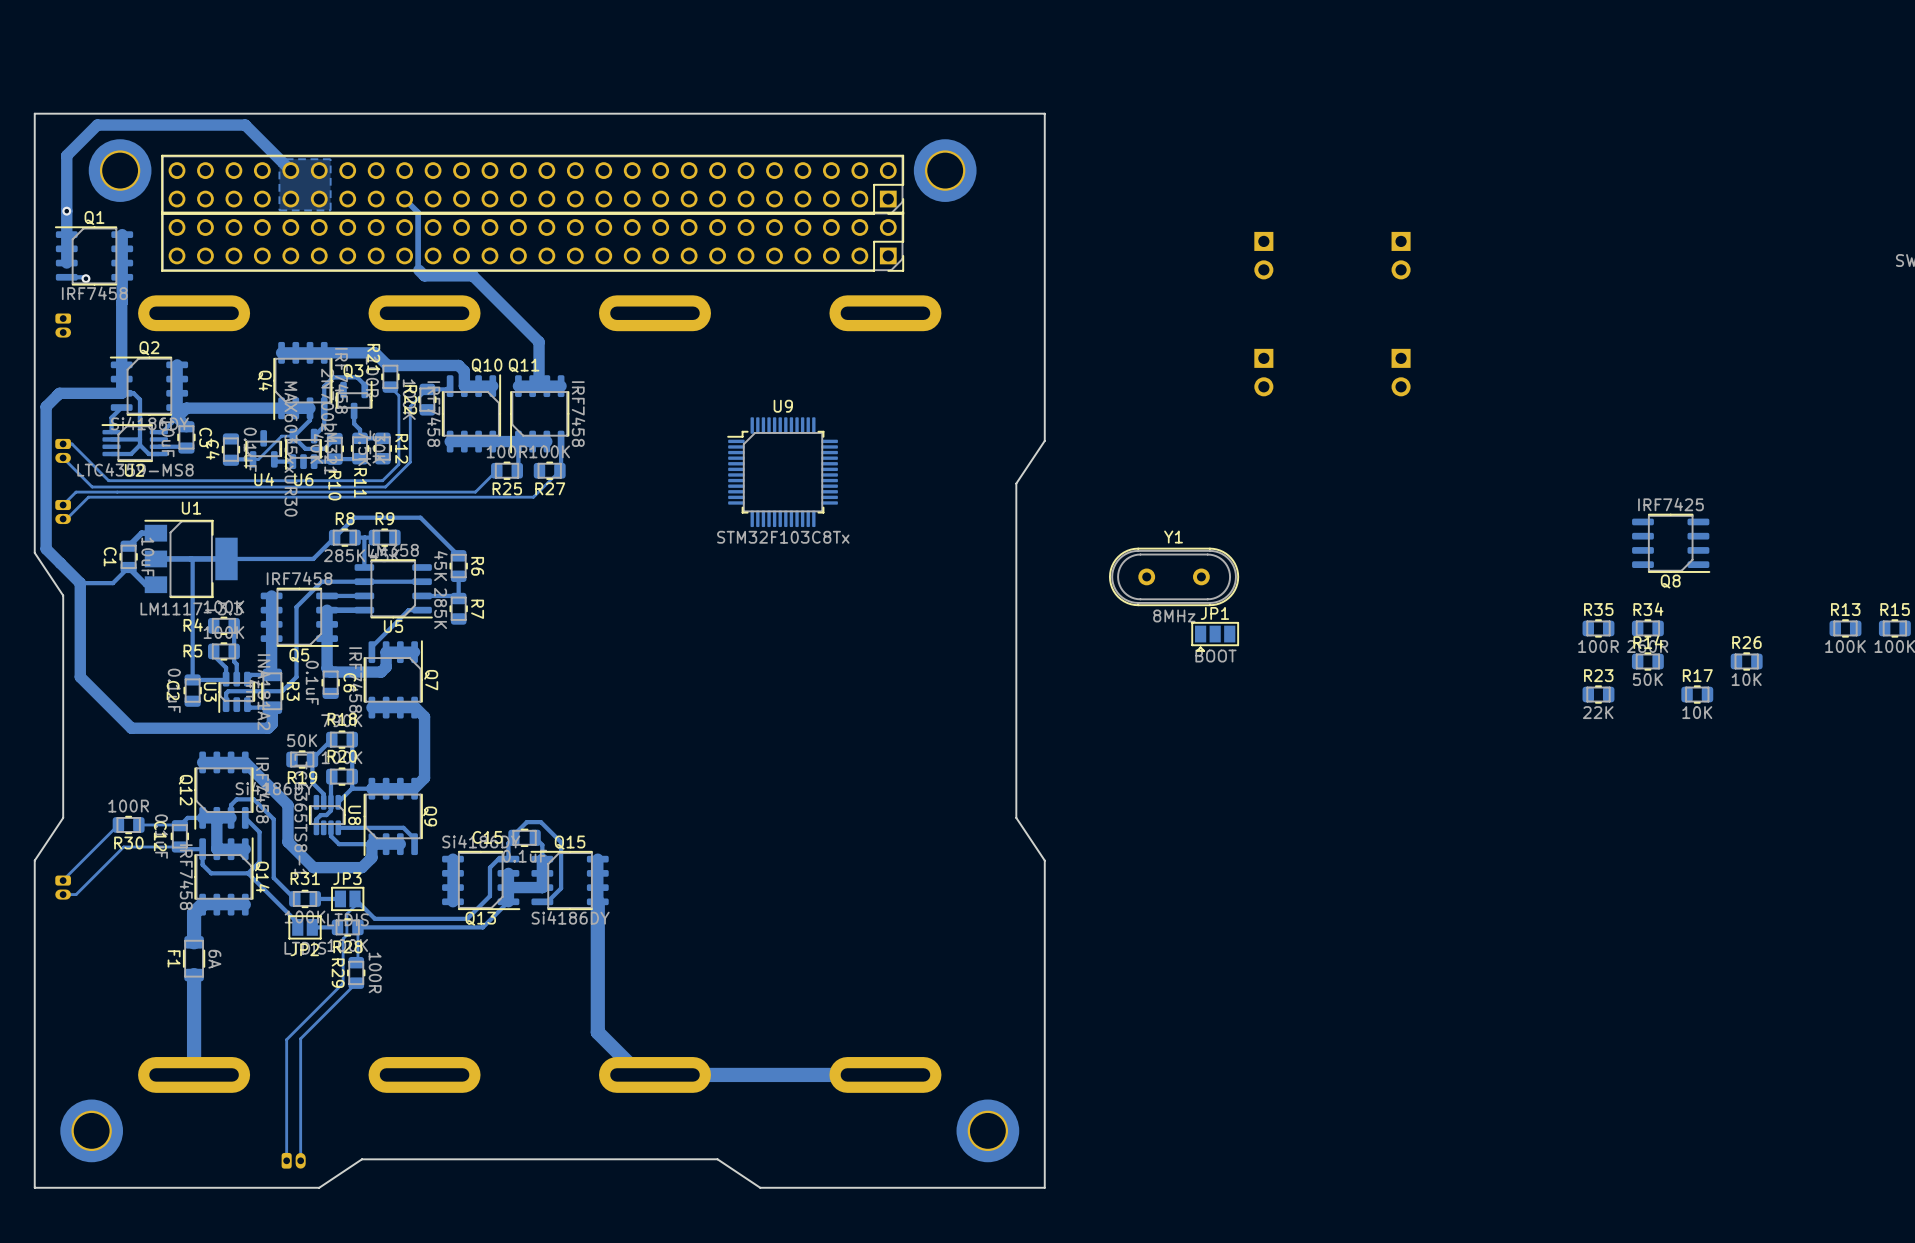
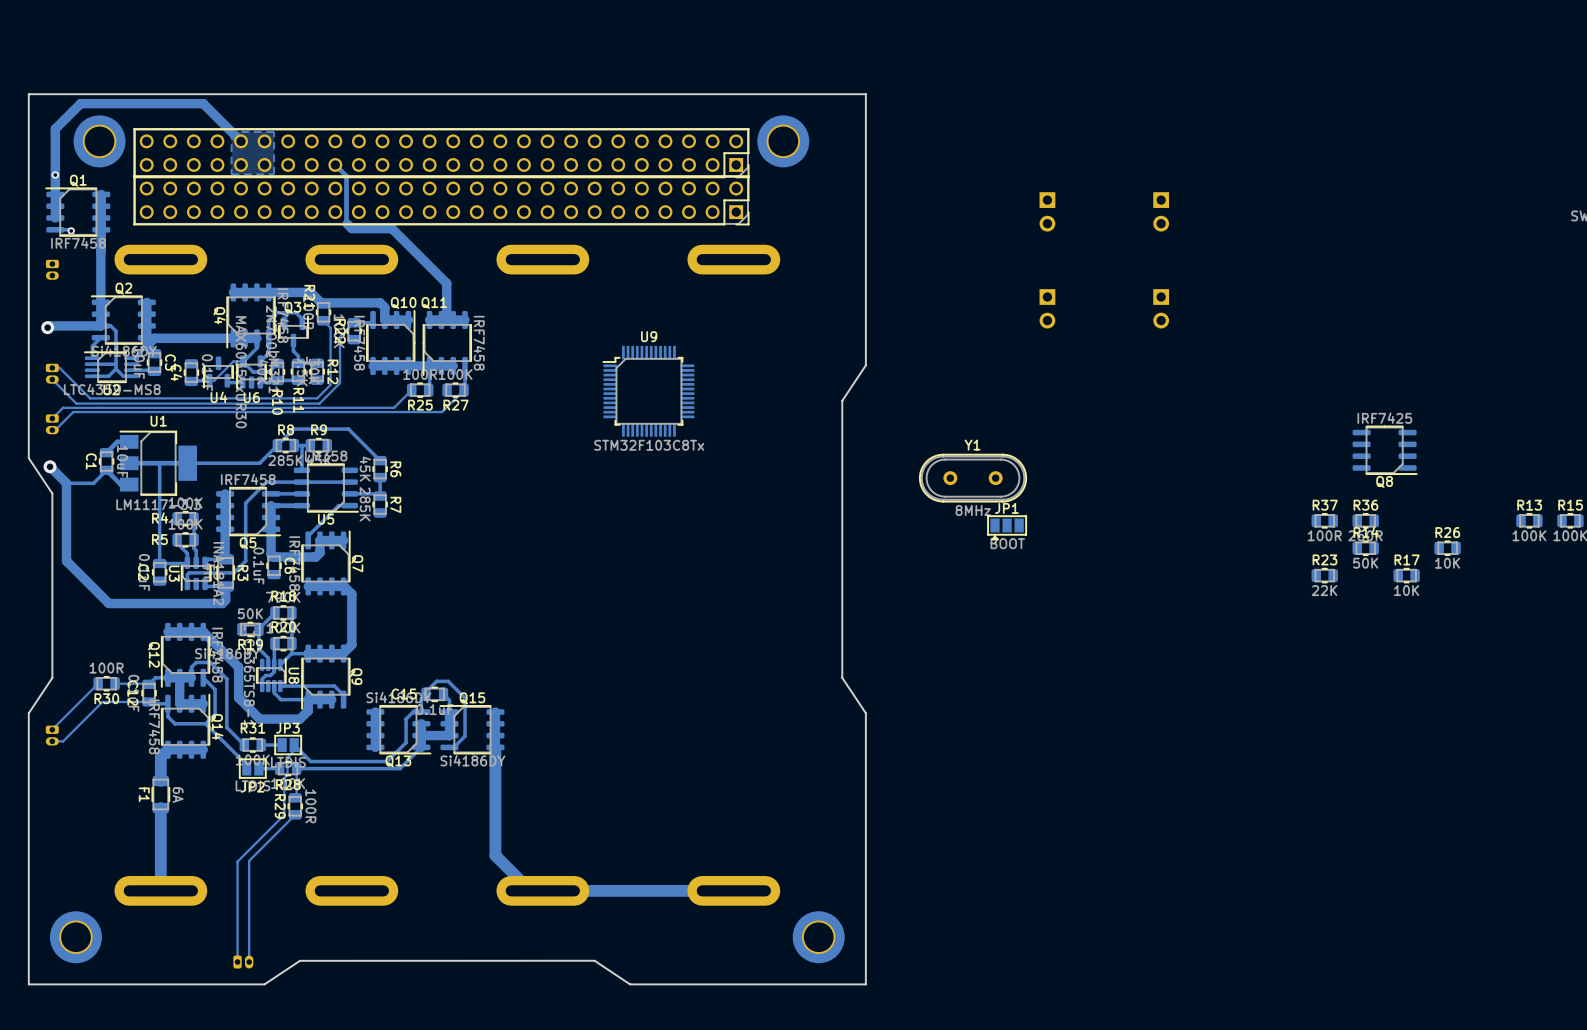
track: (57, 395) (46, 406) (46, 548) (60, 563) -> none
via: none -> (47, 327)
via: none -> (50, 466)
R35 name: R35 (1598, 609) -> R37 (1325, 505)
R34 name: R34 (1648, 609) -> R36 (1365, 505)

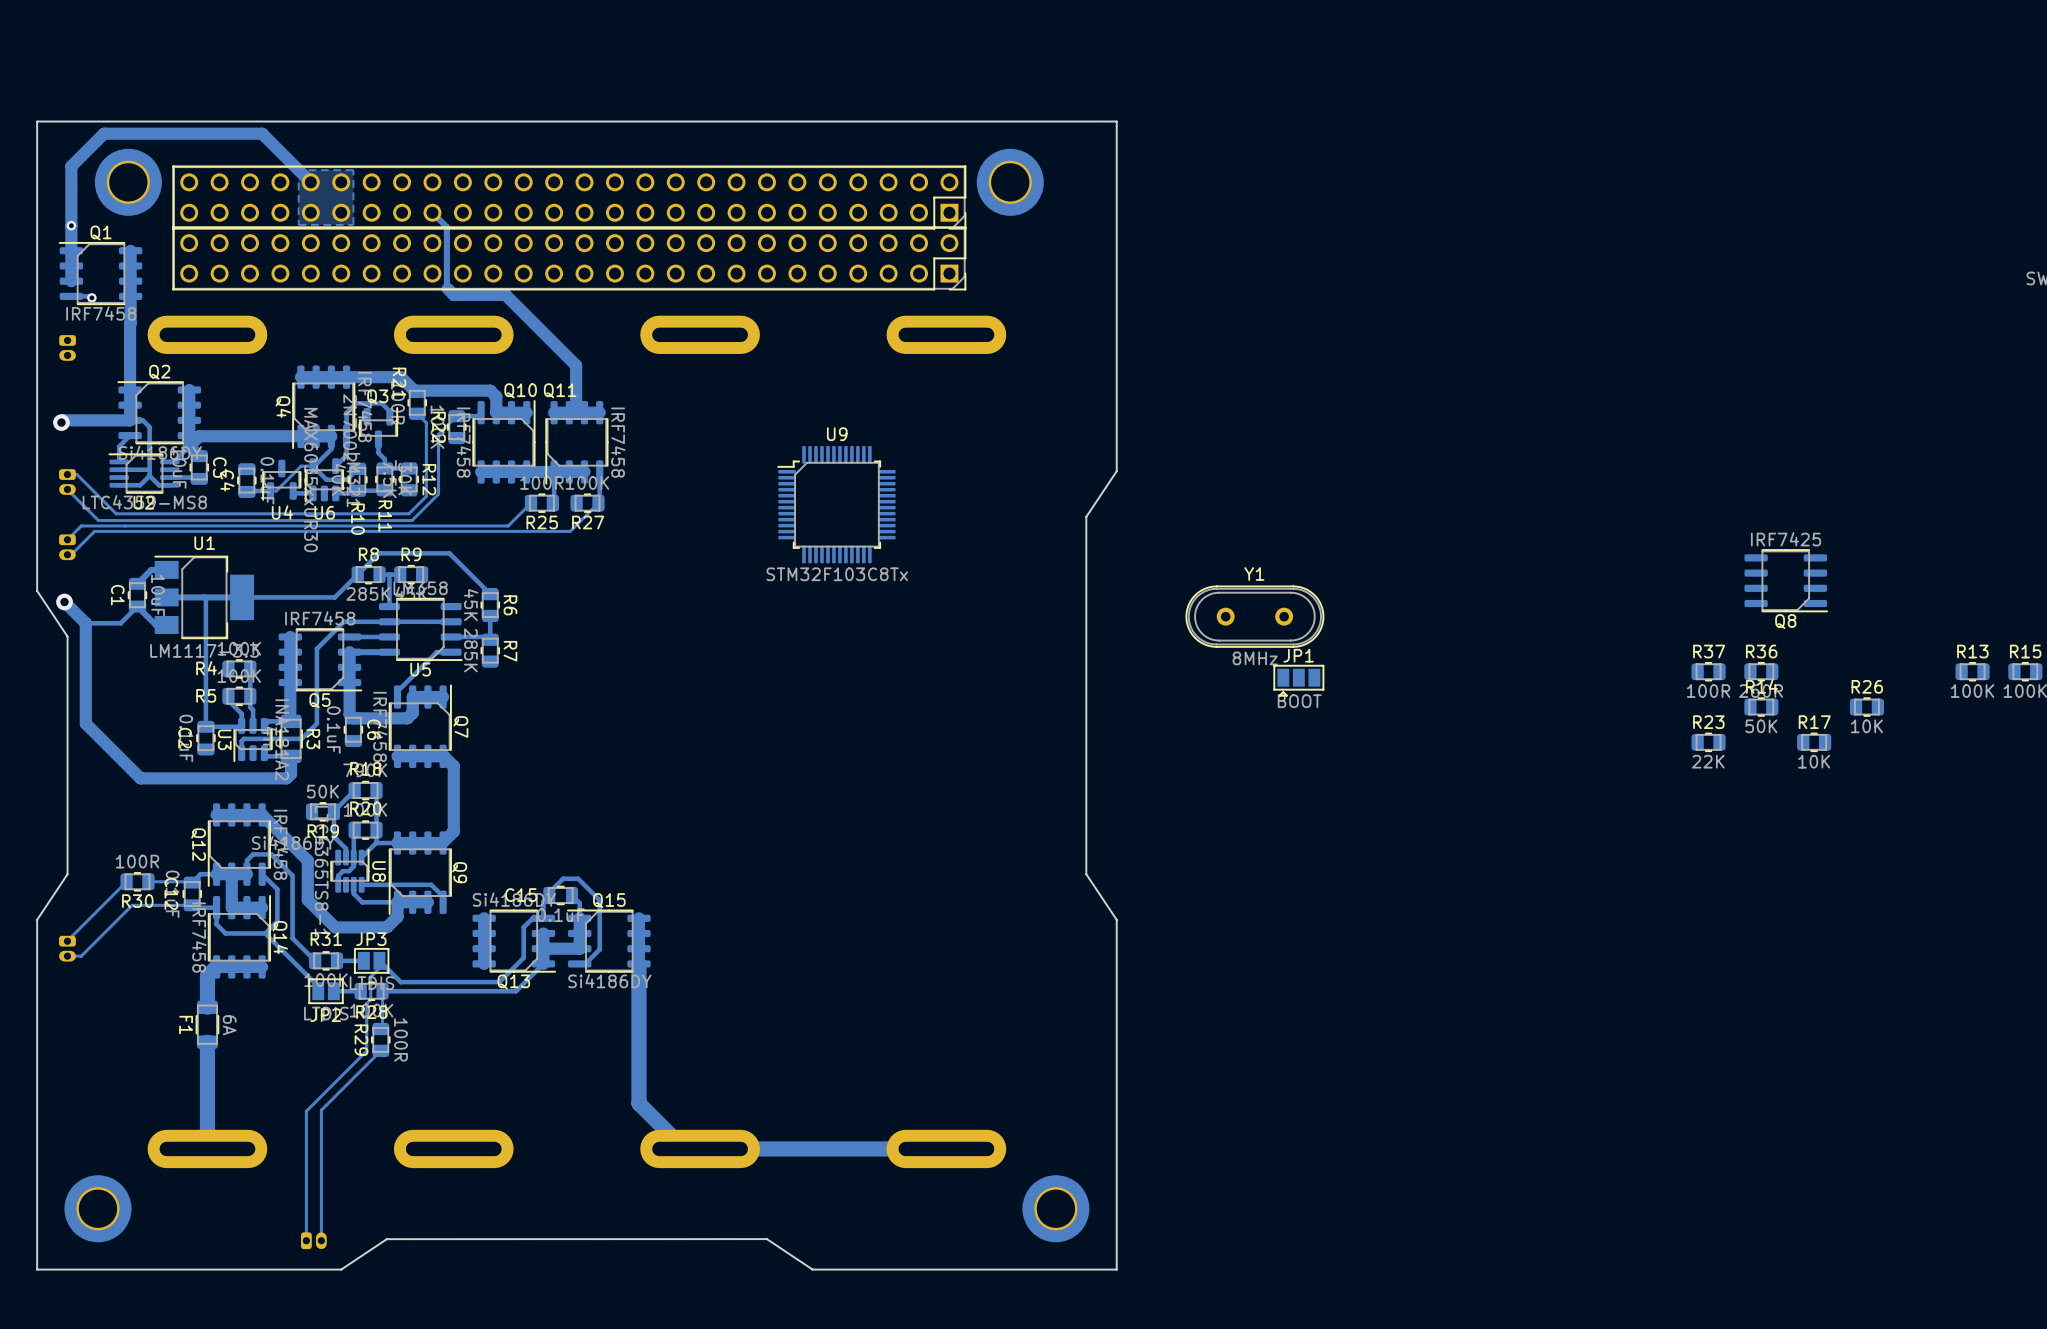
part: (1047, 211) -> none
part: (1161, 211) -> none
part: (1047, 308) -> none
part: (1161, 308) -> none

